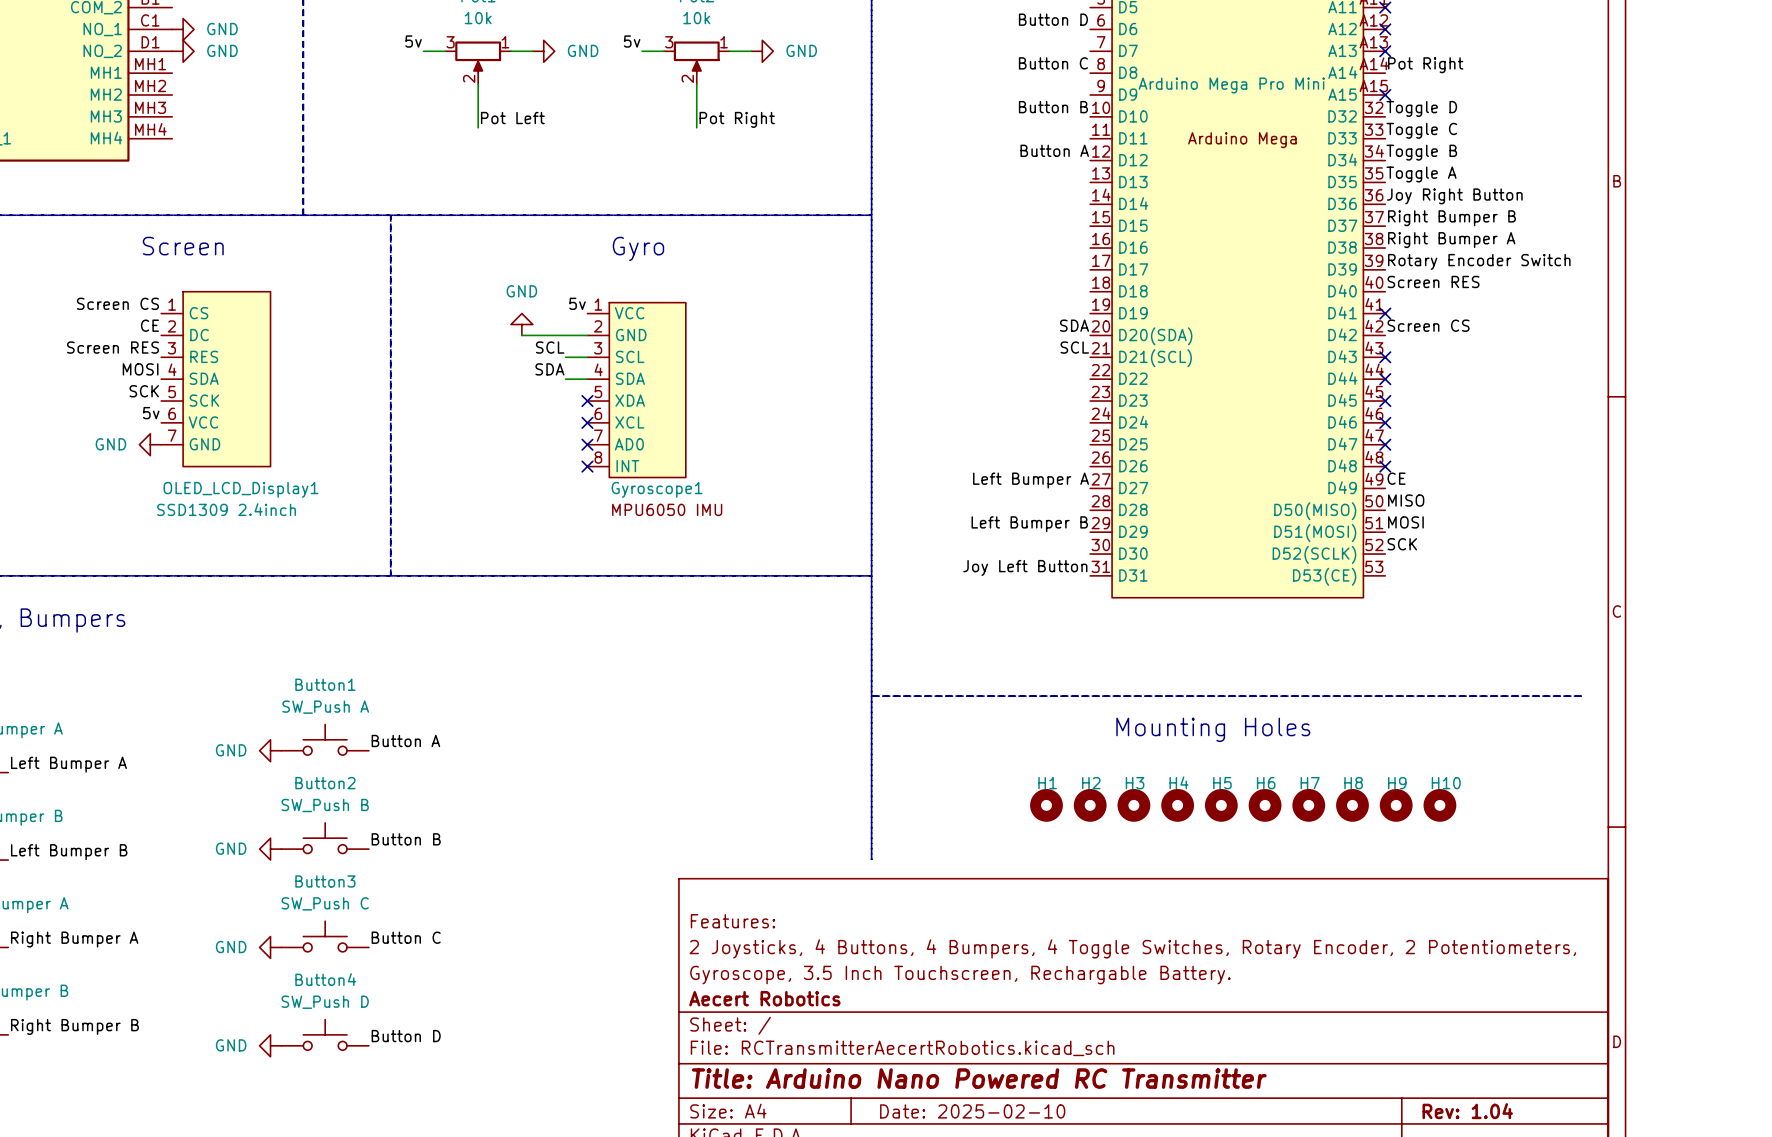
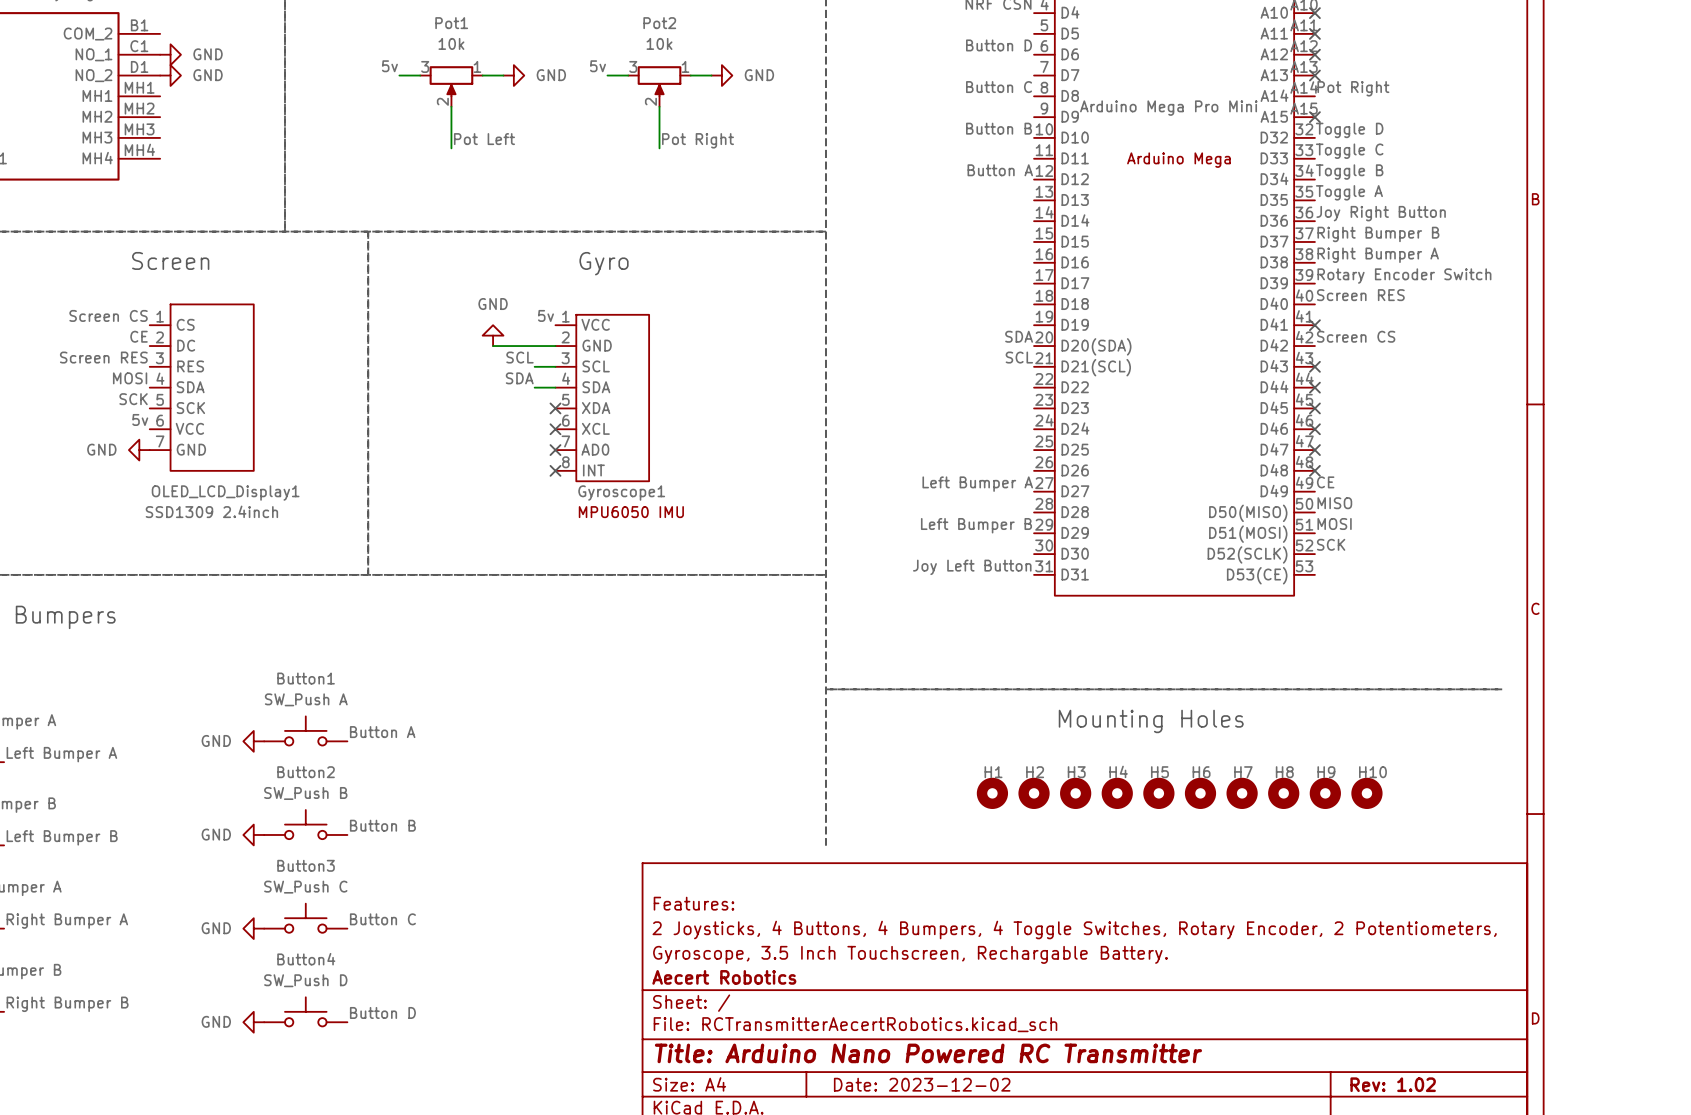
title block: Date: 2025-02-10 (972, 1111) -> Date: 2023-12-02 (922, 1084)
title block: Rev: 1.04 (1467, 1111) -> Rev: 1.02 (1393, 1084)

